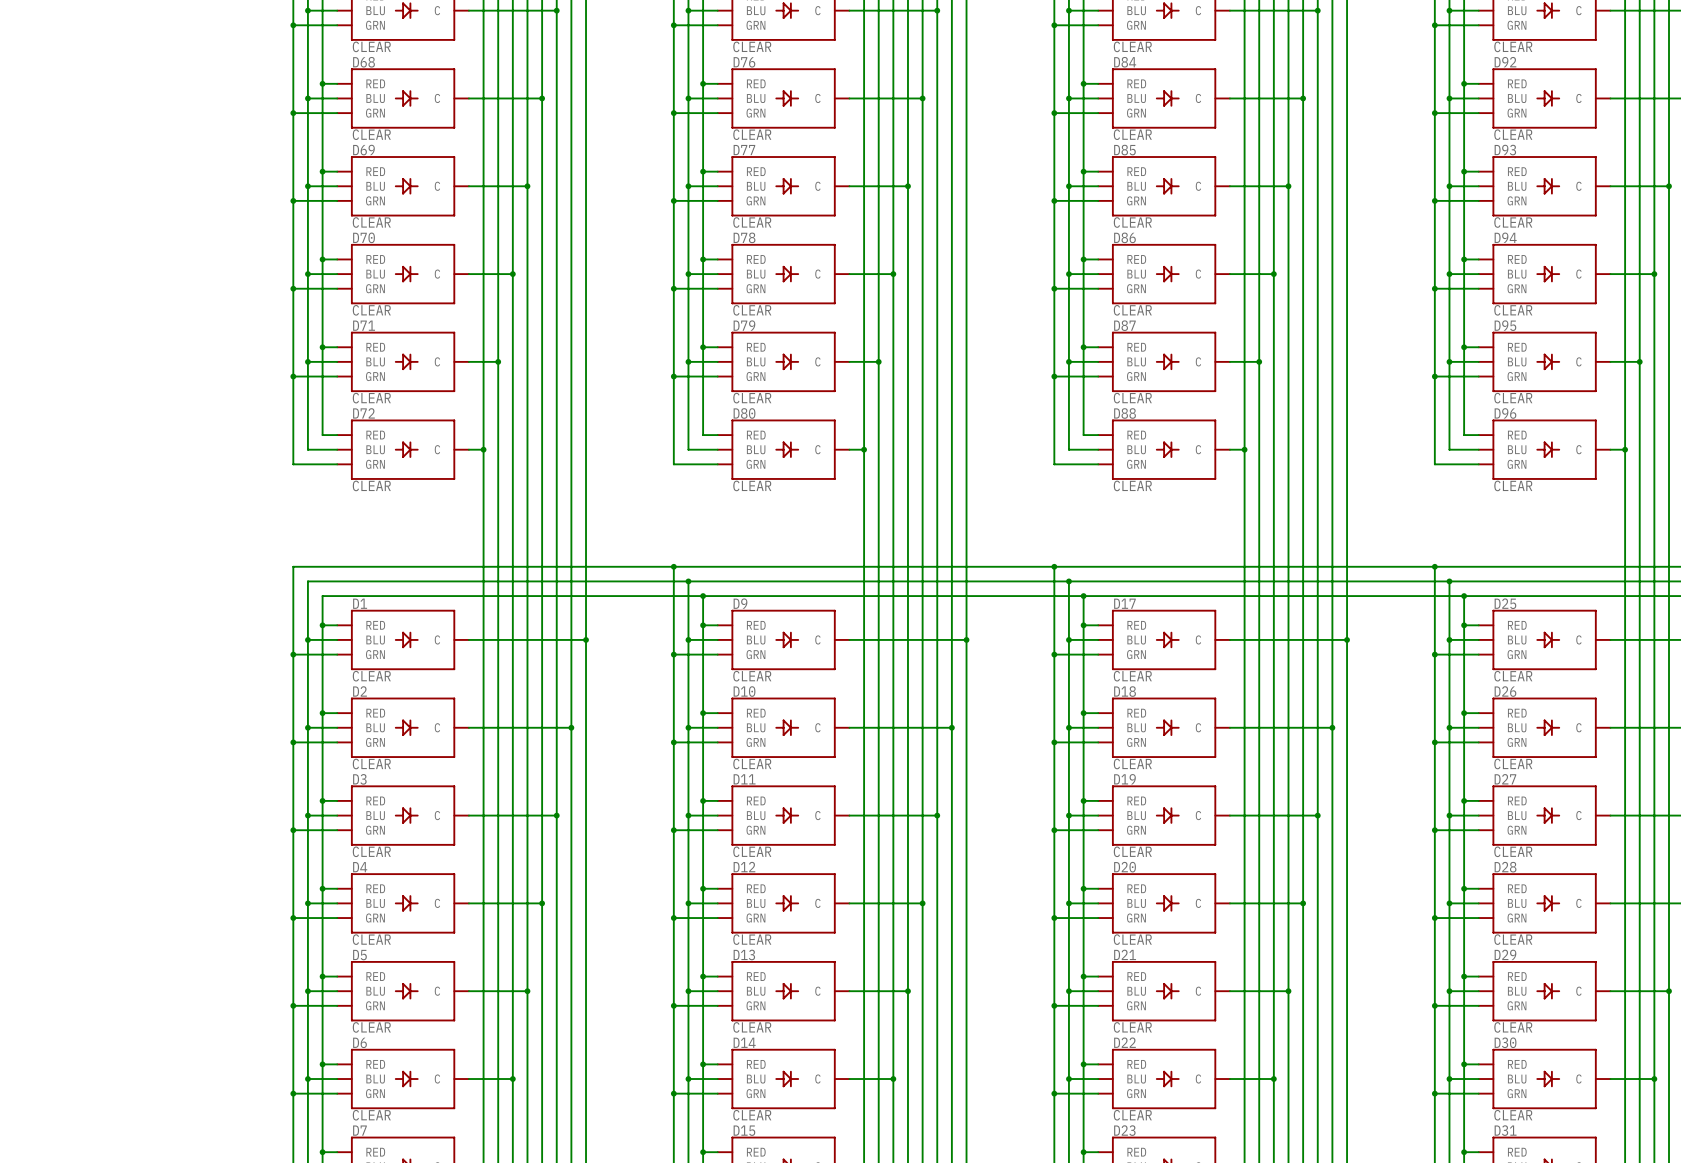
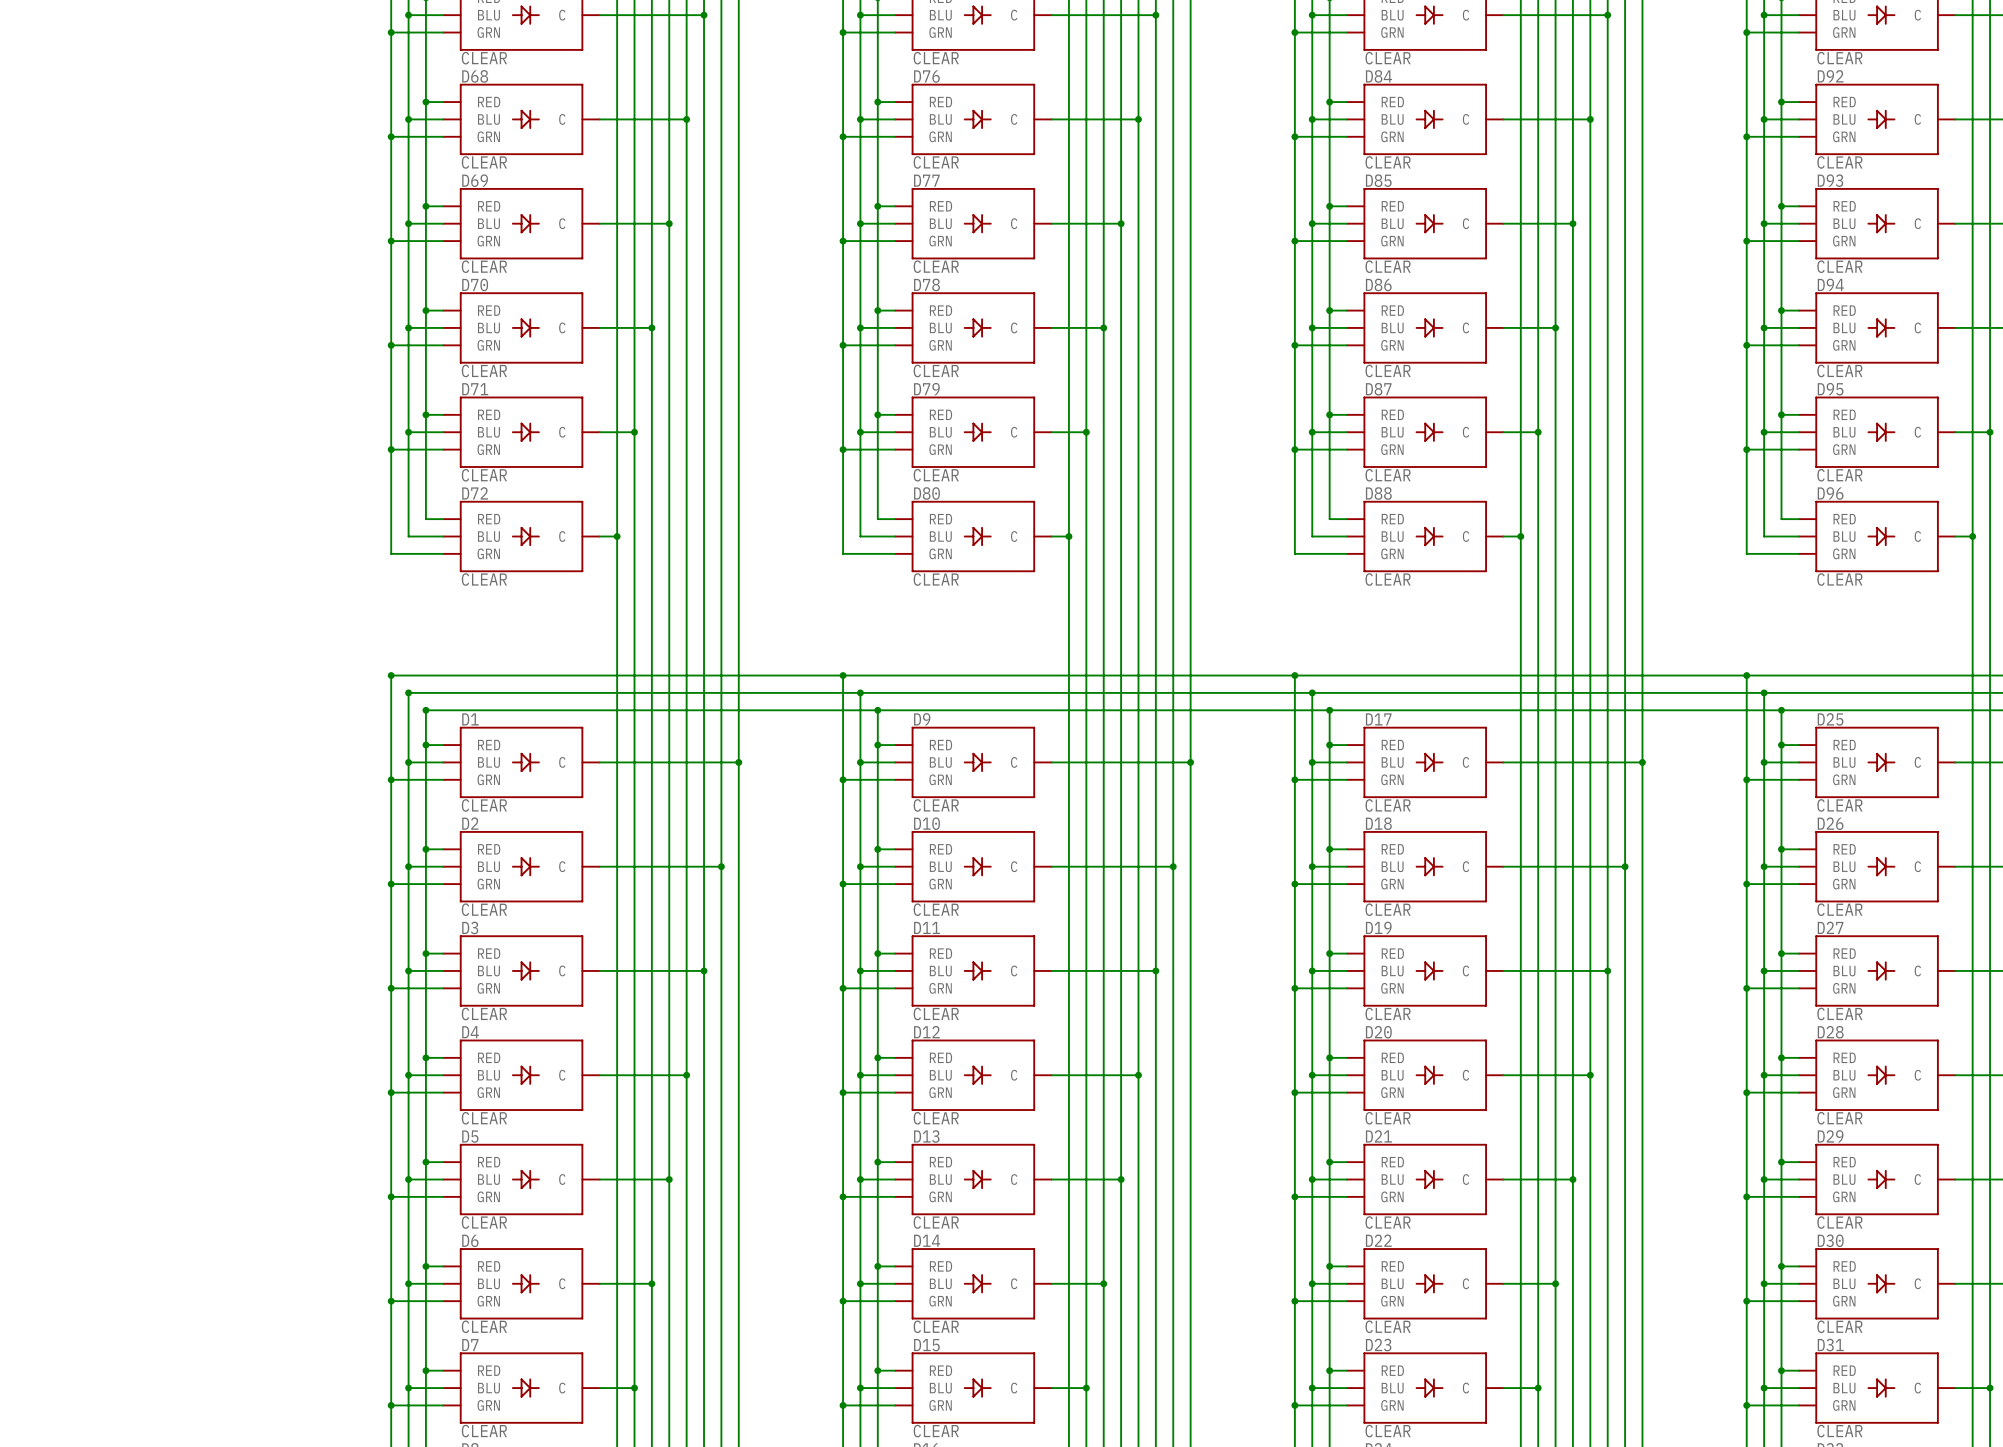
junction: none -> (391, 675)
junction: none -> (408, 692)
junction: none -> (425, 710)

